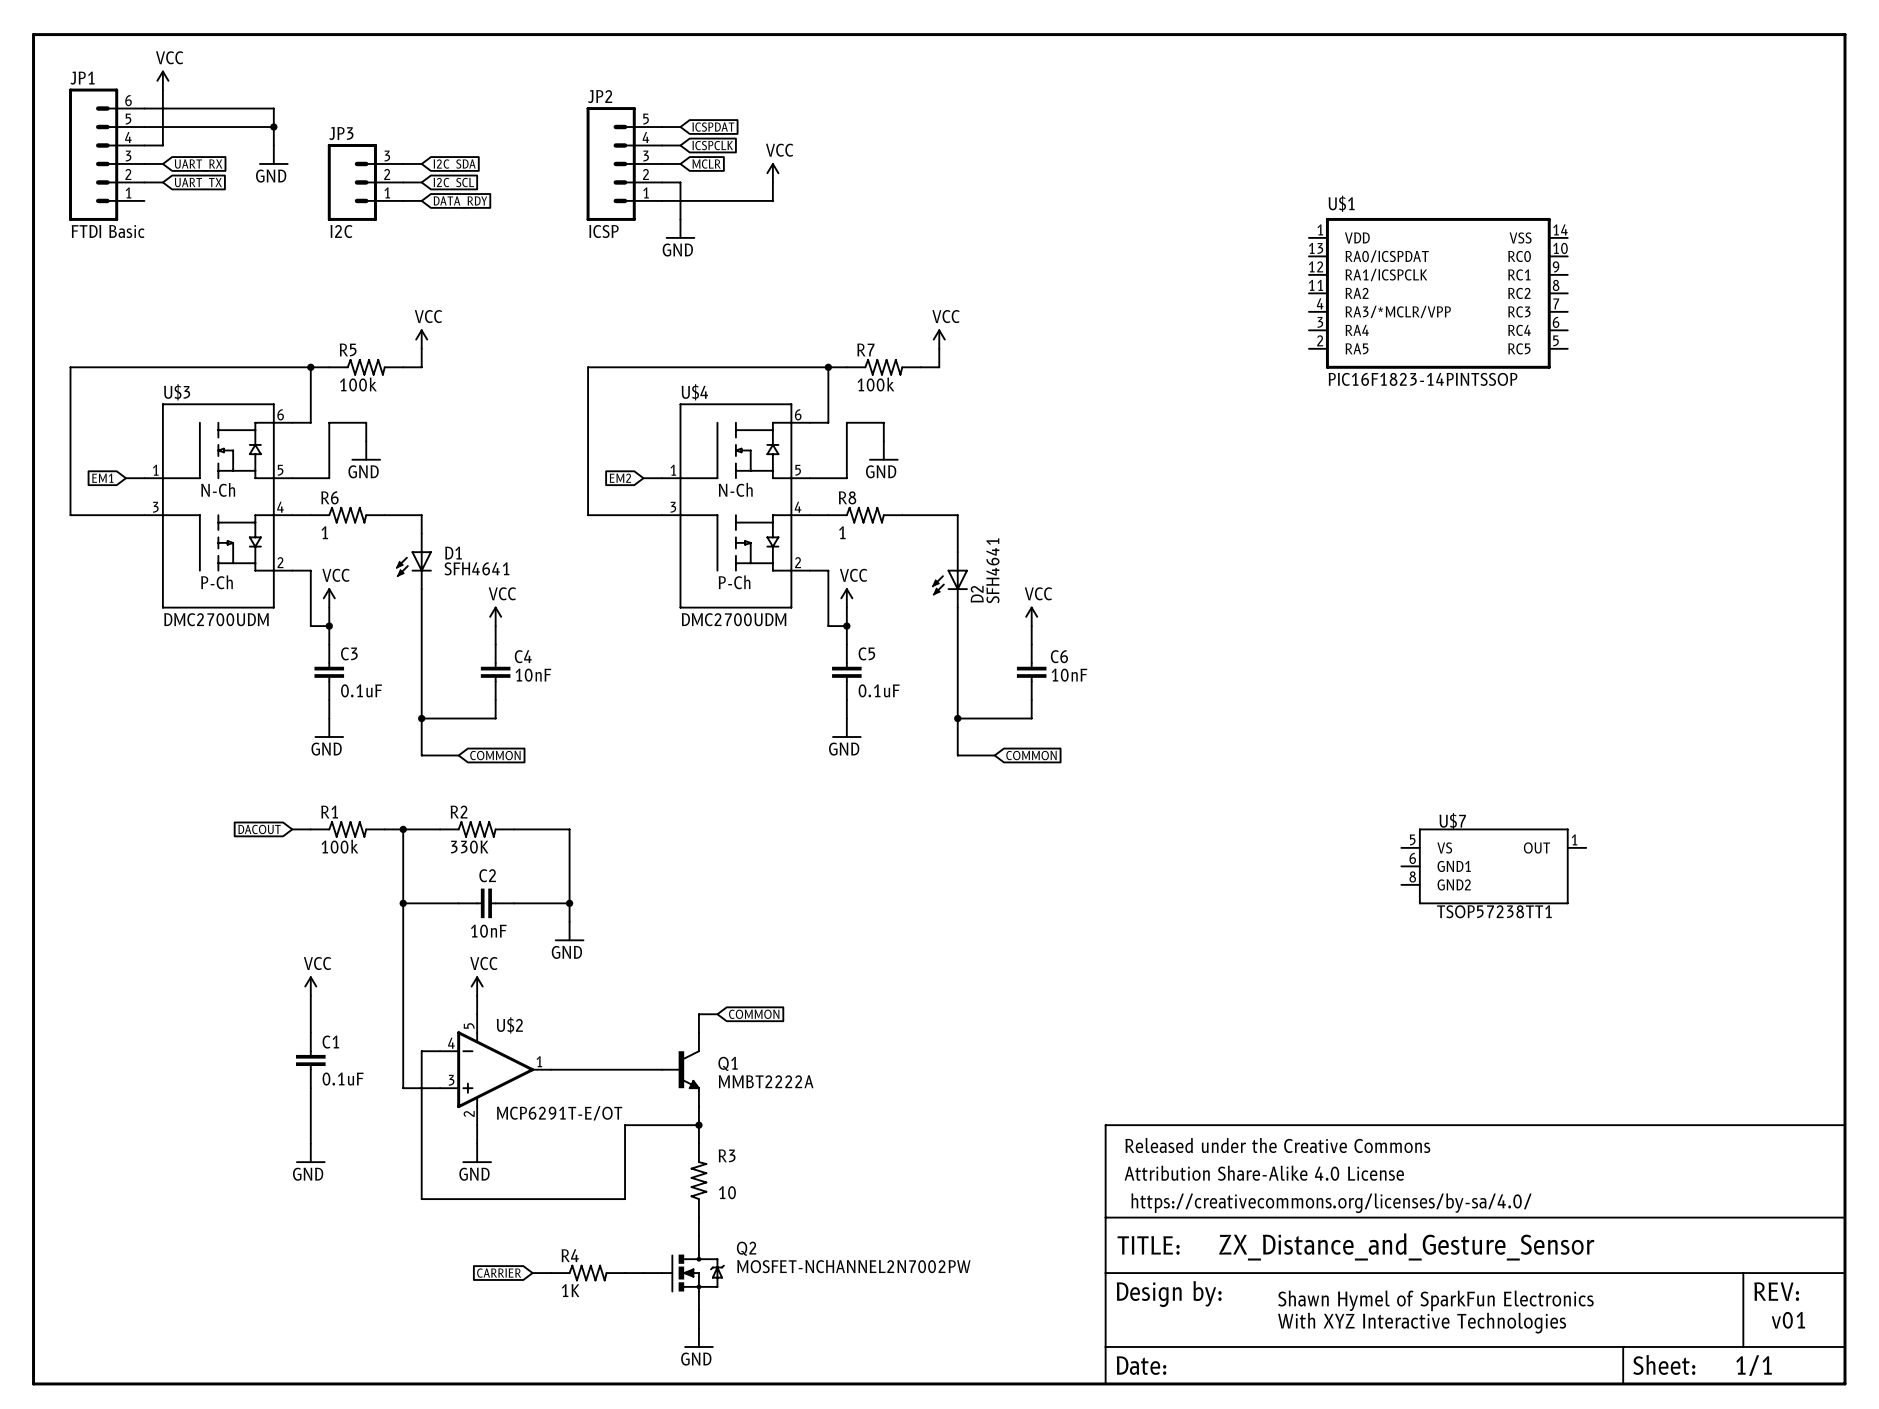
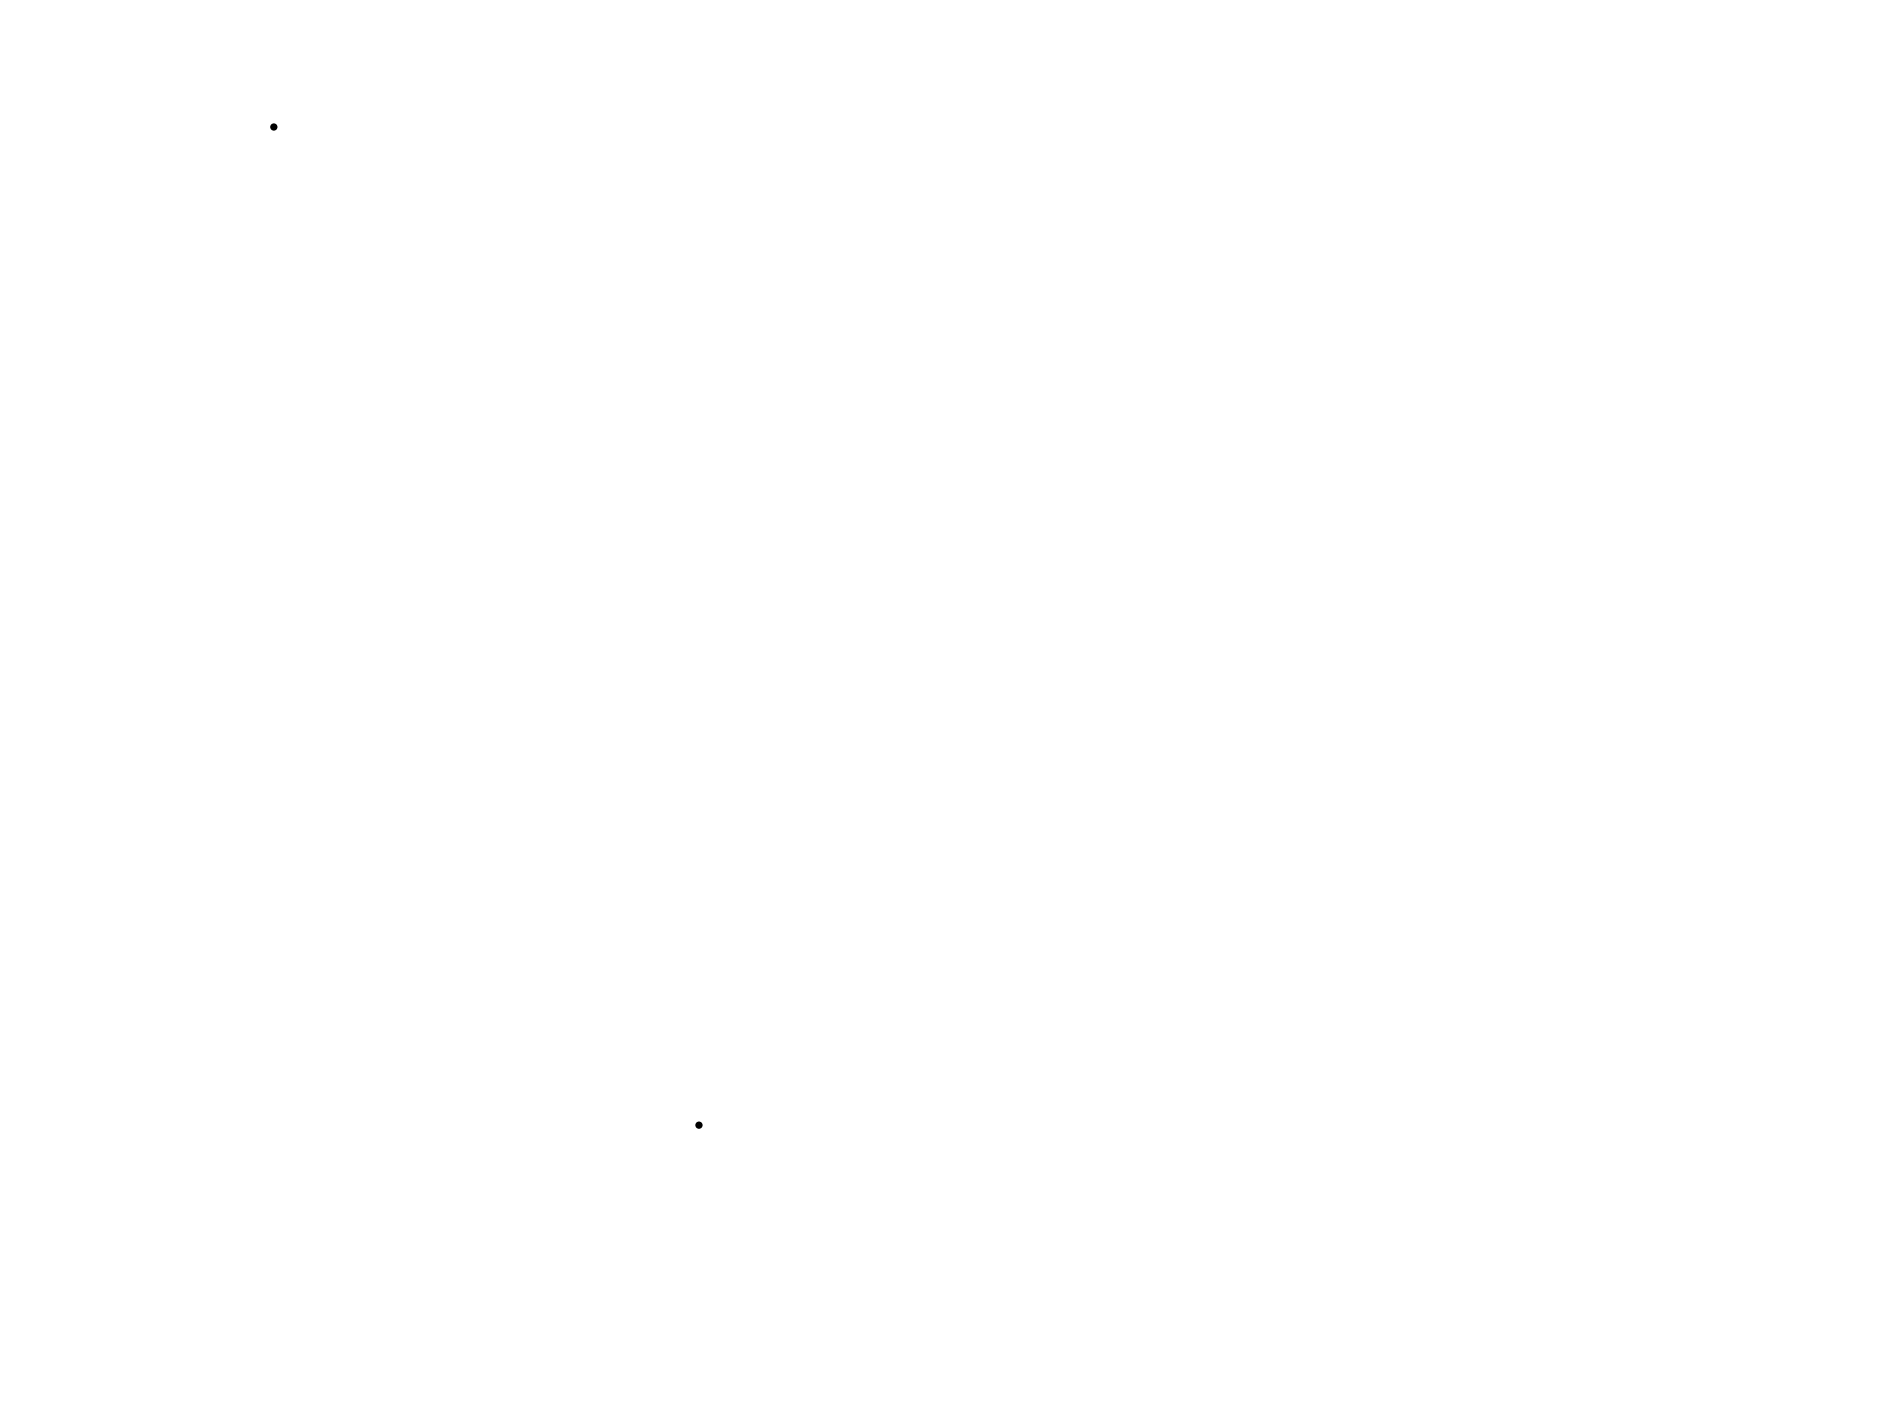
power symbol: VCC (162, 80) -> none
wire: (162, 90) (162, 145) (144, 145) -> none
wire: (144, 108) (273, 108) (273, 145) -> none
wire: (144, 127) (273, 127) -> none
wire: (662, 127) (680, 127) -> none
global label: ICSPDAT (713, 127) -> none
wire: (662, 145) (680, 145) -> none
global label: ICSPCLK (712, 145) -> none
JP1: (106, 154) -> none
power symbol: GND (273, 155) -> none
wire: (144, 163) (162, 163) -> none
wire: (403, 163) (421, 163) -> none
JP2: (624, 163) -> none
wire: (662, 163) (680, 163) -> none
global label: MCLR (706, 164) -> none
global label: UART_RX (198, 165) -> none
global label: I2C_SDA (454, 165) -> none
power symbol: VCC (772, 172) -> none
wire: (144, 182) (162, 182) -> none
JP3: (365, 182) -> none
wire: (403, 182) (421, 182) -> none
wire: (662, 182) (680, 182) (680, 219) -> none
wire: (772, 182) (772, 200) (662, 200) -> none
global label: UART_TX (198, 183) -> none
global label: I2C_SCL (453, 183) -> none
wire: (403, 200) (421, 200) -> none
global label: DATA_RDY (460, 202) -> none
power symbol: GND (680, 229) -> none
text: FTDI Basic (108, 231) -> none
text: I2C (341, 231) -> none
text: ICSP (603, 231) -> none
U$1: PIC16F1823-14PINTSSOP (1438, 293) -> none
power symbol: VCC (421, 339) -> none
power symbol: VCC (939, 339) -> none
wire: (421, 348) (421, 367) (403, 367) -> none
wire: (939, 348) (939, 367) (920, 367) -> none
wire: (310, 367) (310, 422) (292, 422) -> none
junction: (310, 367) -> none
wire: (329, 367) (70, 367) (70, 515) (144, 515) -> none
R5: 100k (366, 367) -> none
wire: (828, 367) (828, 422) (809, 422) -> none
junction: (828, 367) -> none
wire: (846, 367) (588, 367) (588, 515) (662, 515) -> none
R7: 100k (883, 367) -> none
wire: (366, 441) (366, 422) (329, 422) (329, 478) (292, 478) -> none
wire: (883, 441) (883, 422) (846, 422) (846, 478) (809, 478) -> none
power symbol: GND (366, 450) -> none
power symbol: GND (883, 450) -> none
global label: EM1 (102, 478) -> none
wire: (125, 478) (144, 478) -> none
global label: EM2 (620, 478) -> none
wire: (643, 478) (662, 478) -> none
U$3: DMC2700UDM (218, 505) -> none
U$4: DMC2700UDM (735, 505) -> none
wire: (292, 515) (310, 515) -> none
R6: 1 (347, 515) -> none
wire: (384, 515) (421, 515) (421, 533) -> none
wire: (809, 515) (828, 515) -> none
R8: 1 (865, 515) -> none
wire: (902, 515) (957, 515) (957, 552) -> none
D1: SFH4641 (414, 561) -> none
wire: (292, 570) (310, 570) (310, 626) (329, 626) -> none
wire: (809, 570) (828, 570) (828, 626) (846, 626) -> none
D2: SFH4641 (950, 579) -> none
wire: (421, 589) (421, 755) (458, 755) -> none
power symbol: VCC (329, 597) -> none
power symbol: VCC (846, 597) -> none
wire: (329, 607) (329, 644) -> none
wire: (846, 607) (846, 644) -> none
wire: (957, 607) (957, 755) (994, 755) -> none
power symbol: VCC (495, 616) -> none
power symbol: VCC (1031, 616) -> none
junction: (329, 626) -> none
wire: (495, 626) (495, 644) -> none
junction: (846, 626) -> none
wire: (1031, 626) (1031, 644) -> none
C3: 0.1uF (329, 672) -> none
C4: 10nF (495, 672) -> none
C5: 0.1uF (846, 672) -> none
C6: 10nF (1031, 672) -> none
wire: (329, 700) (329, 718) -> none
wire: (495, 700) (495, 718) (421, 718) -> none
wire: (846, 700) (846, 718) -> none
wire: (1031, 700) (1031, 718) (957, 718) -> none
part: (939, 709) -> none
junction: (421, 718) -> none
junction: (957, 718) -> none
power symbol: GND (329, 728) -> none
power symbol: GND (846, 728) -> none
global label: COMMON (495, 755) -> none
global label: COMMON (1031, 755) -> none
global label: DACOUT (259, 829) -> none
wire: (292, 829) (310, 829) -> none
R1: 100k (347, 829) -> none
wire: (384, 829) (440, 829) -> none
wire: (403, 829) (403, 1088) (440, 1088) -> none
junction: (403, 829) -> none
R2: 330K (477, 829) -> none
wire: (514, 829) (569, 829) (569, 921) -> none
U$7: TSOP57238TT1 (1493, 866) -> none
wire: (403, 903) (458, 903) -> none
junction: (403, 903) -> none
C2: 10nF (486, 903) -> none
wire: (514, 903) (569, 903) -> none
junction: (569, 903) -> none
power symbol: GND (569, 931) -> none
power symbol: VCC (310, 986) -> none
power symbol: VCC (477, 986) -> none
wire: (310, 995) (310, 1032) -> none
wire: (477, 995) (477, 1014) -> none
wire: (717, 1014) (698, 1014) (698, 1032) -> none
global label: COMMON (754, 1014) -> none
wire: (440, 1051) (421, 1051) (421, 1199) (625, 1199) (625, 1125) (698, 1125) -> none
C1: 0.1uF (310, 1060) -> none
U$2: MCP6291T-E/OT (495, 1069) -> none
wire: (551, 1069) (662, 1069) -> none
Q1: MMBT2222A (680, 1069) -> none
wire: (310, 1088) (310, 1143) -> none
wire: (698, 1106) (698, 1143) -> none
wire: (477, 1125) (477, 1143) -> none
power symbol: GND (310, 1153) -> none
power symbol: GND (477, 1153) -> none
R3: 10 (698, 1180) -> none
wire: (698, 1217) (698, 1236) -> none
part: (1475, 1254) -> none
global label: CARRIER (499, 1273) -> none
wire: (532, 1273) (551, 1273) -> none
R4: 1K (588, 1273) -> none
wire: (625, 1273) (643, 1273) -> none
Q2: MOSFET-NCHANNEL2N7002PW (683, 1273) -> none
text: Shawn Hymel of SparkFun Electronics (1435, 1300) -> none
wire: (698, 1310) (698, 1328) -> none
text: v01 (1788, 1320) -> none
text: With XYZ Interactive Technologies (1422, 1323) -> none
power symbol: GND (698, 1338) -> none

